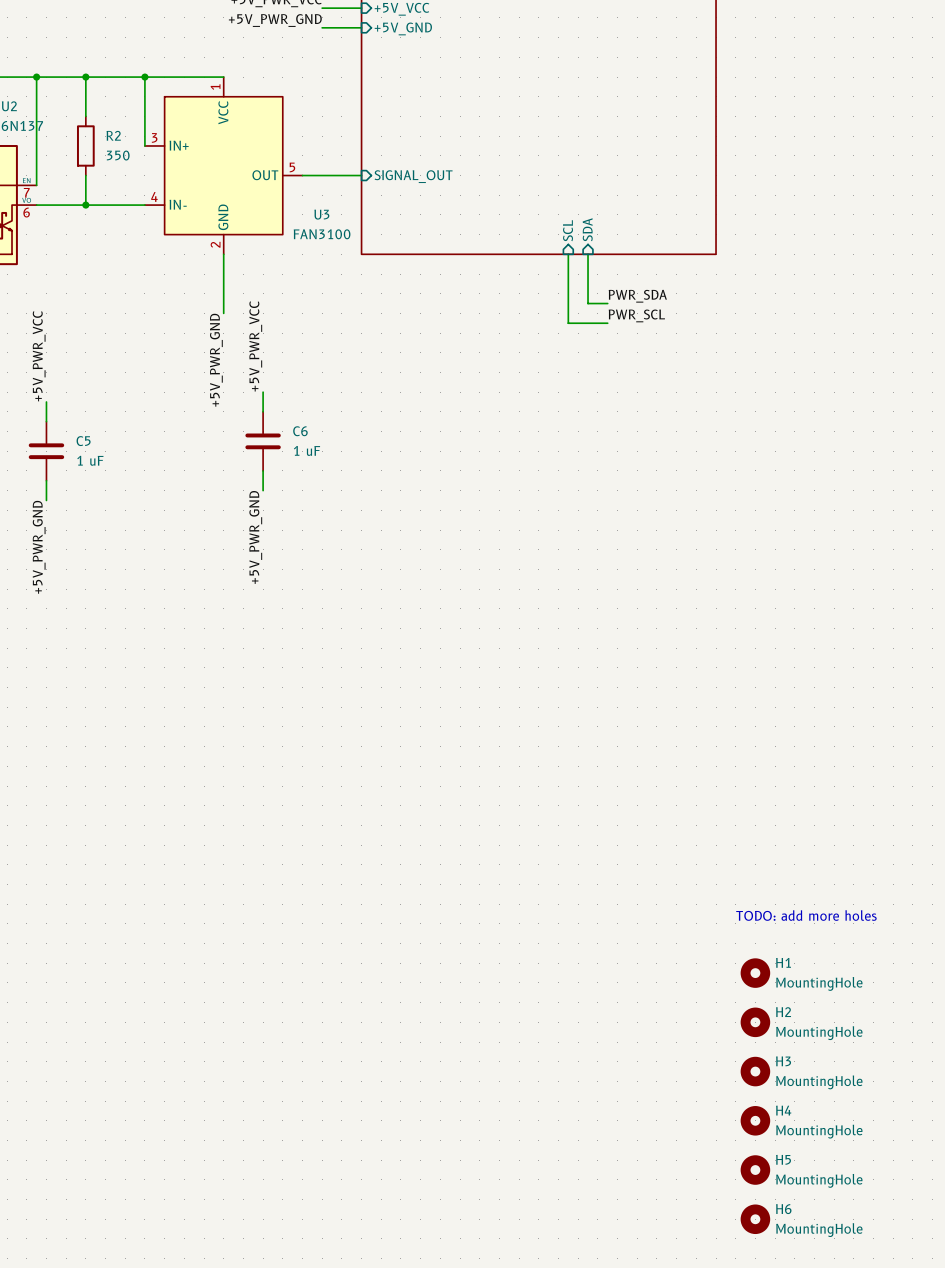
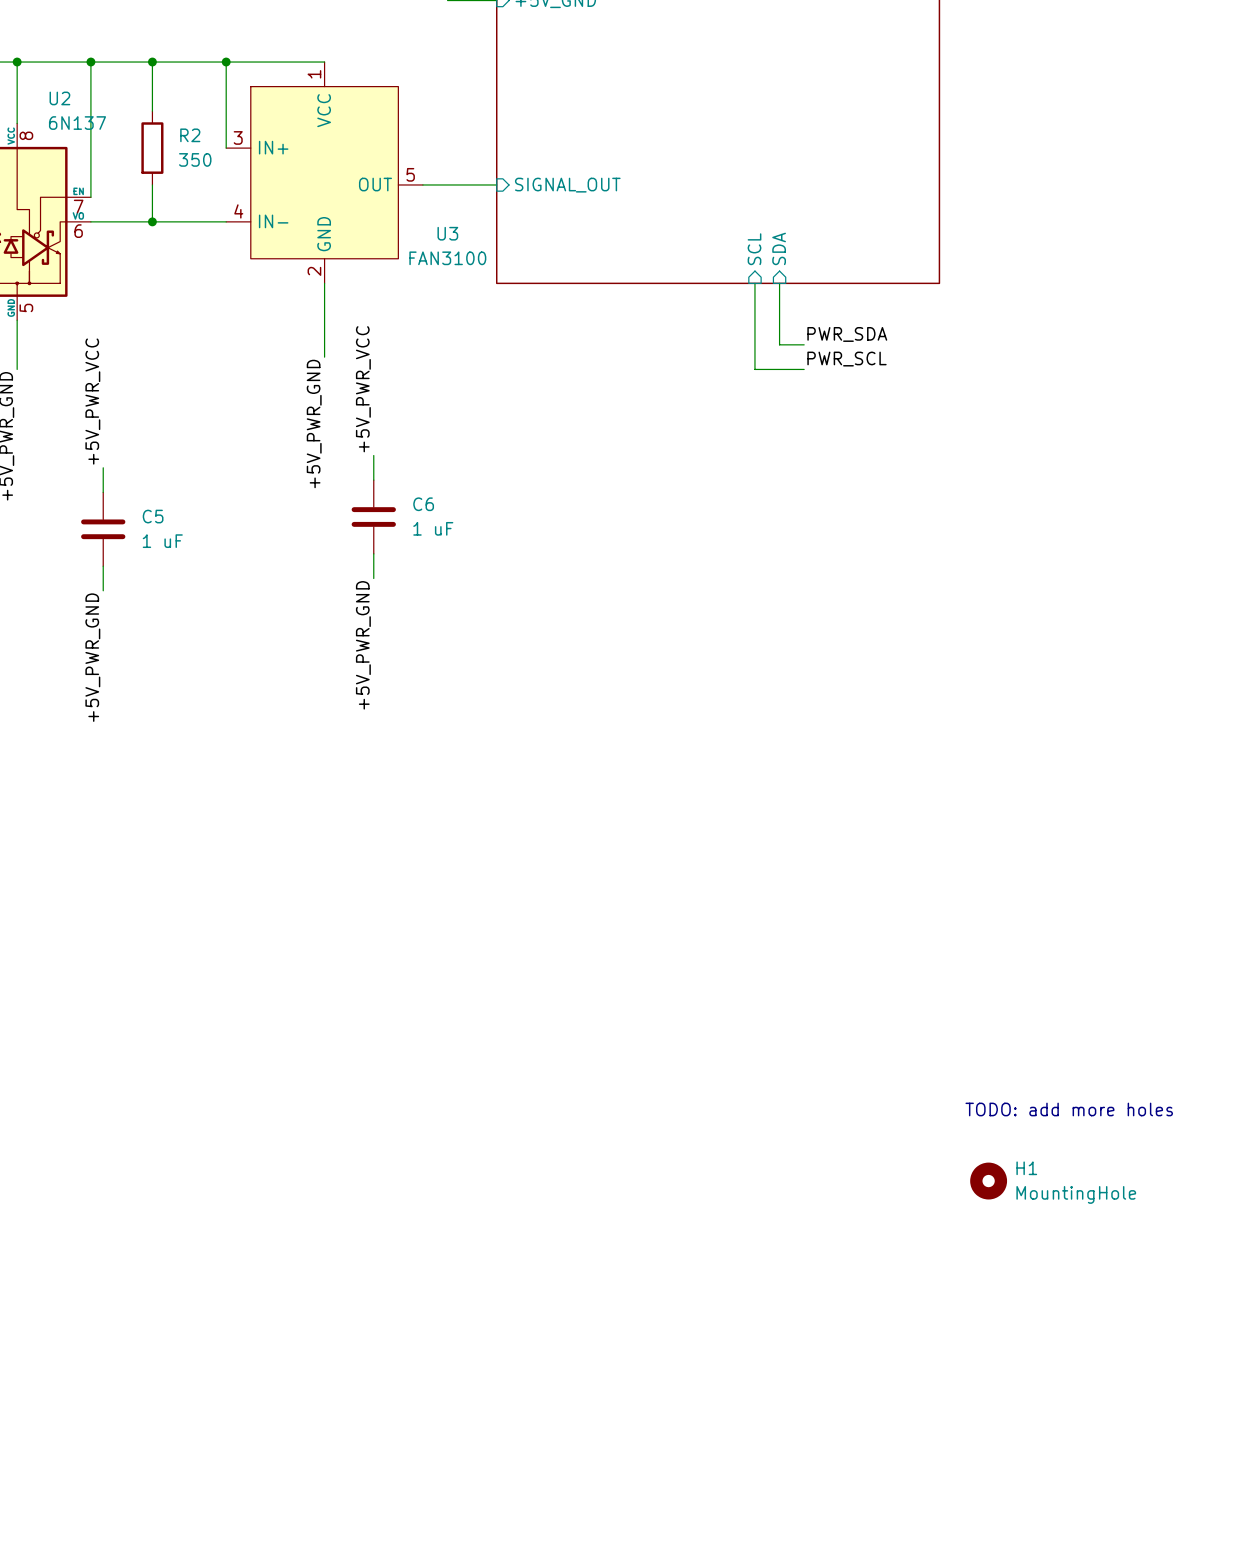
H2: MountingHole (755, 1022) -> none
H3: MountingHole (755, 1071) -> none
H4: MountingHole (755, 1120) -> none
H5: MountingHole (755, 1170) -> none
H6: MountingHole (755, 1219) -> none

